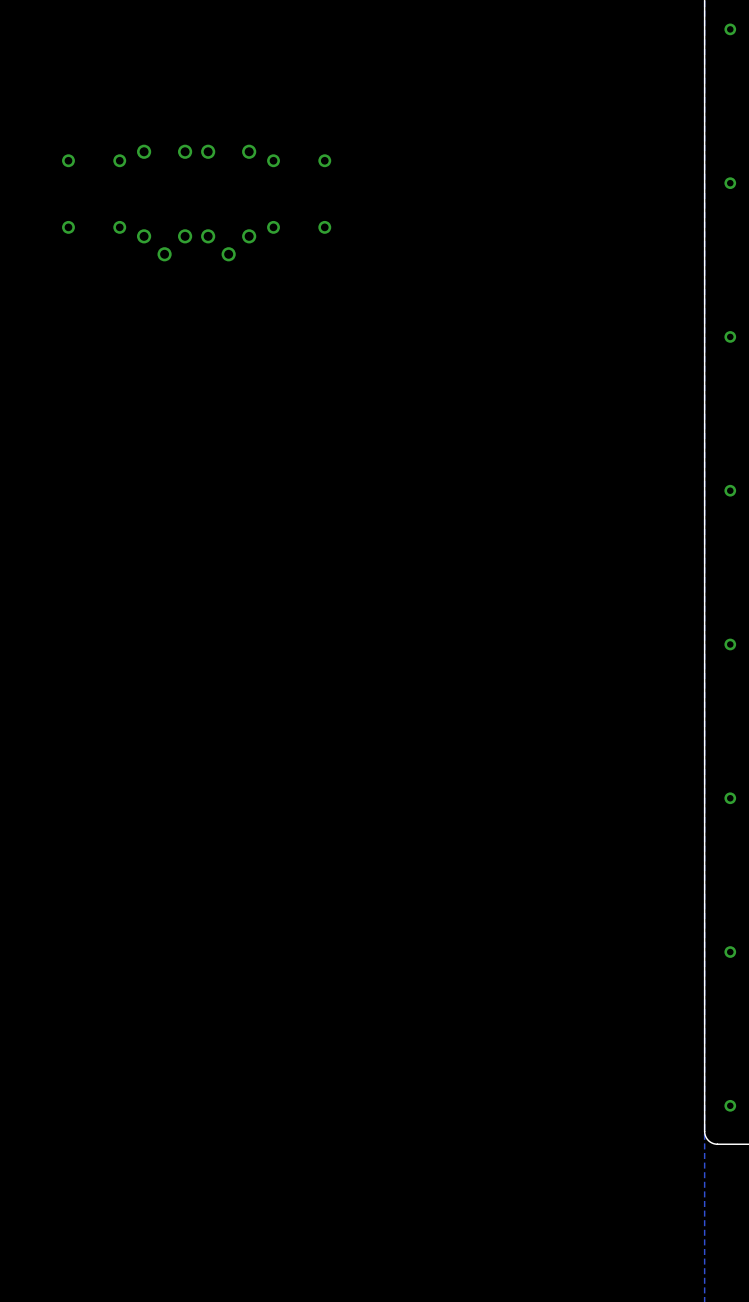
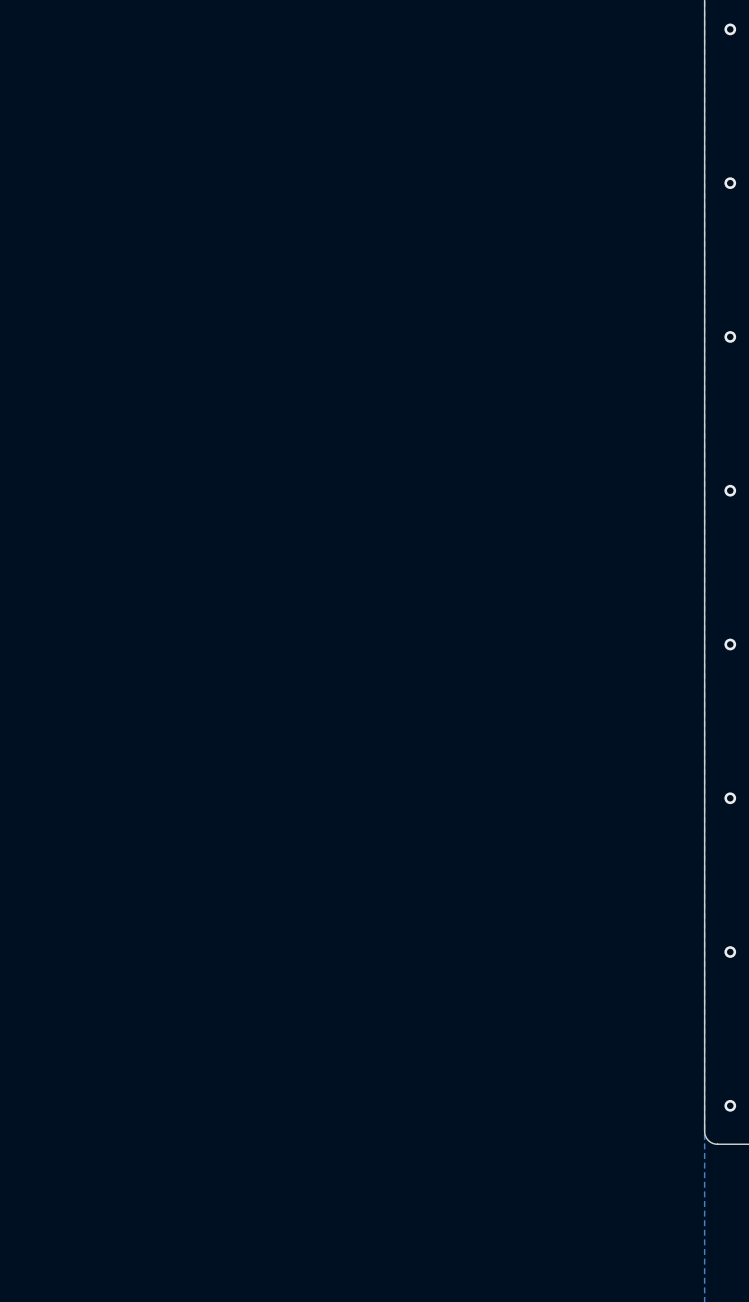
via: (144, 151) -> none
via: (185, 151) -> none
via: (208, 151) -> none
via: (249, 151) -> none
via: (68, 160) -> none
via: (119, 160) -> none
via: (273, 160) -> none
via: (324, 160) -> none
via: (68, 227) -> none
via: (119, 227) -> none
via: (273, 227) -> none
via: (324, 227) -> none
via: (144, 236) -> none
via: (185, 236) -> none
via: (208, 236) -> none
via: (249, 236) -> none
via: (164, 254) -> none
via: (228, 254) -> none

